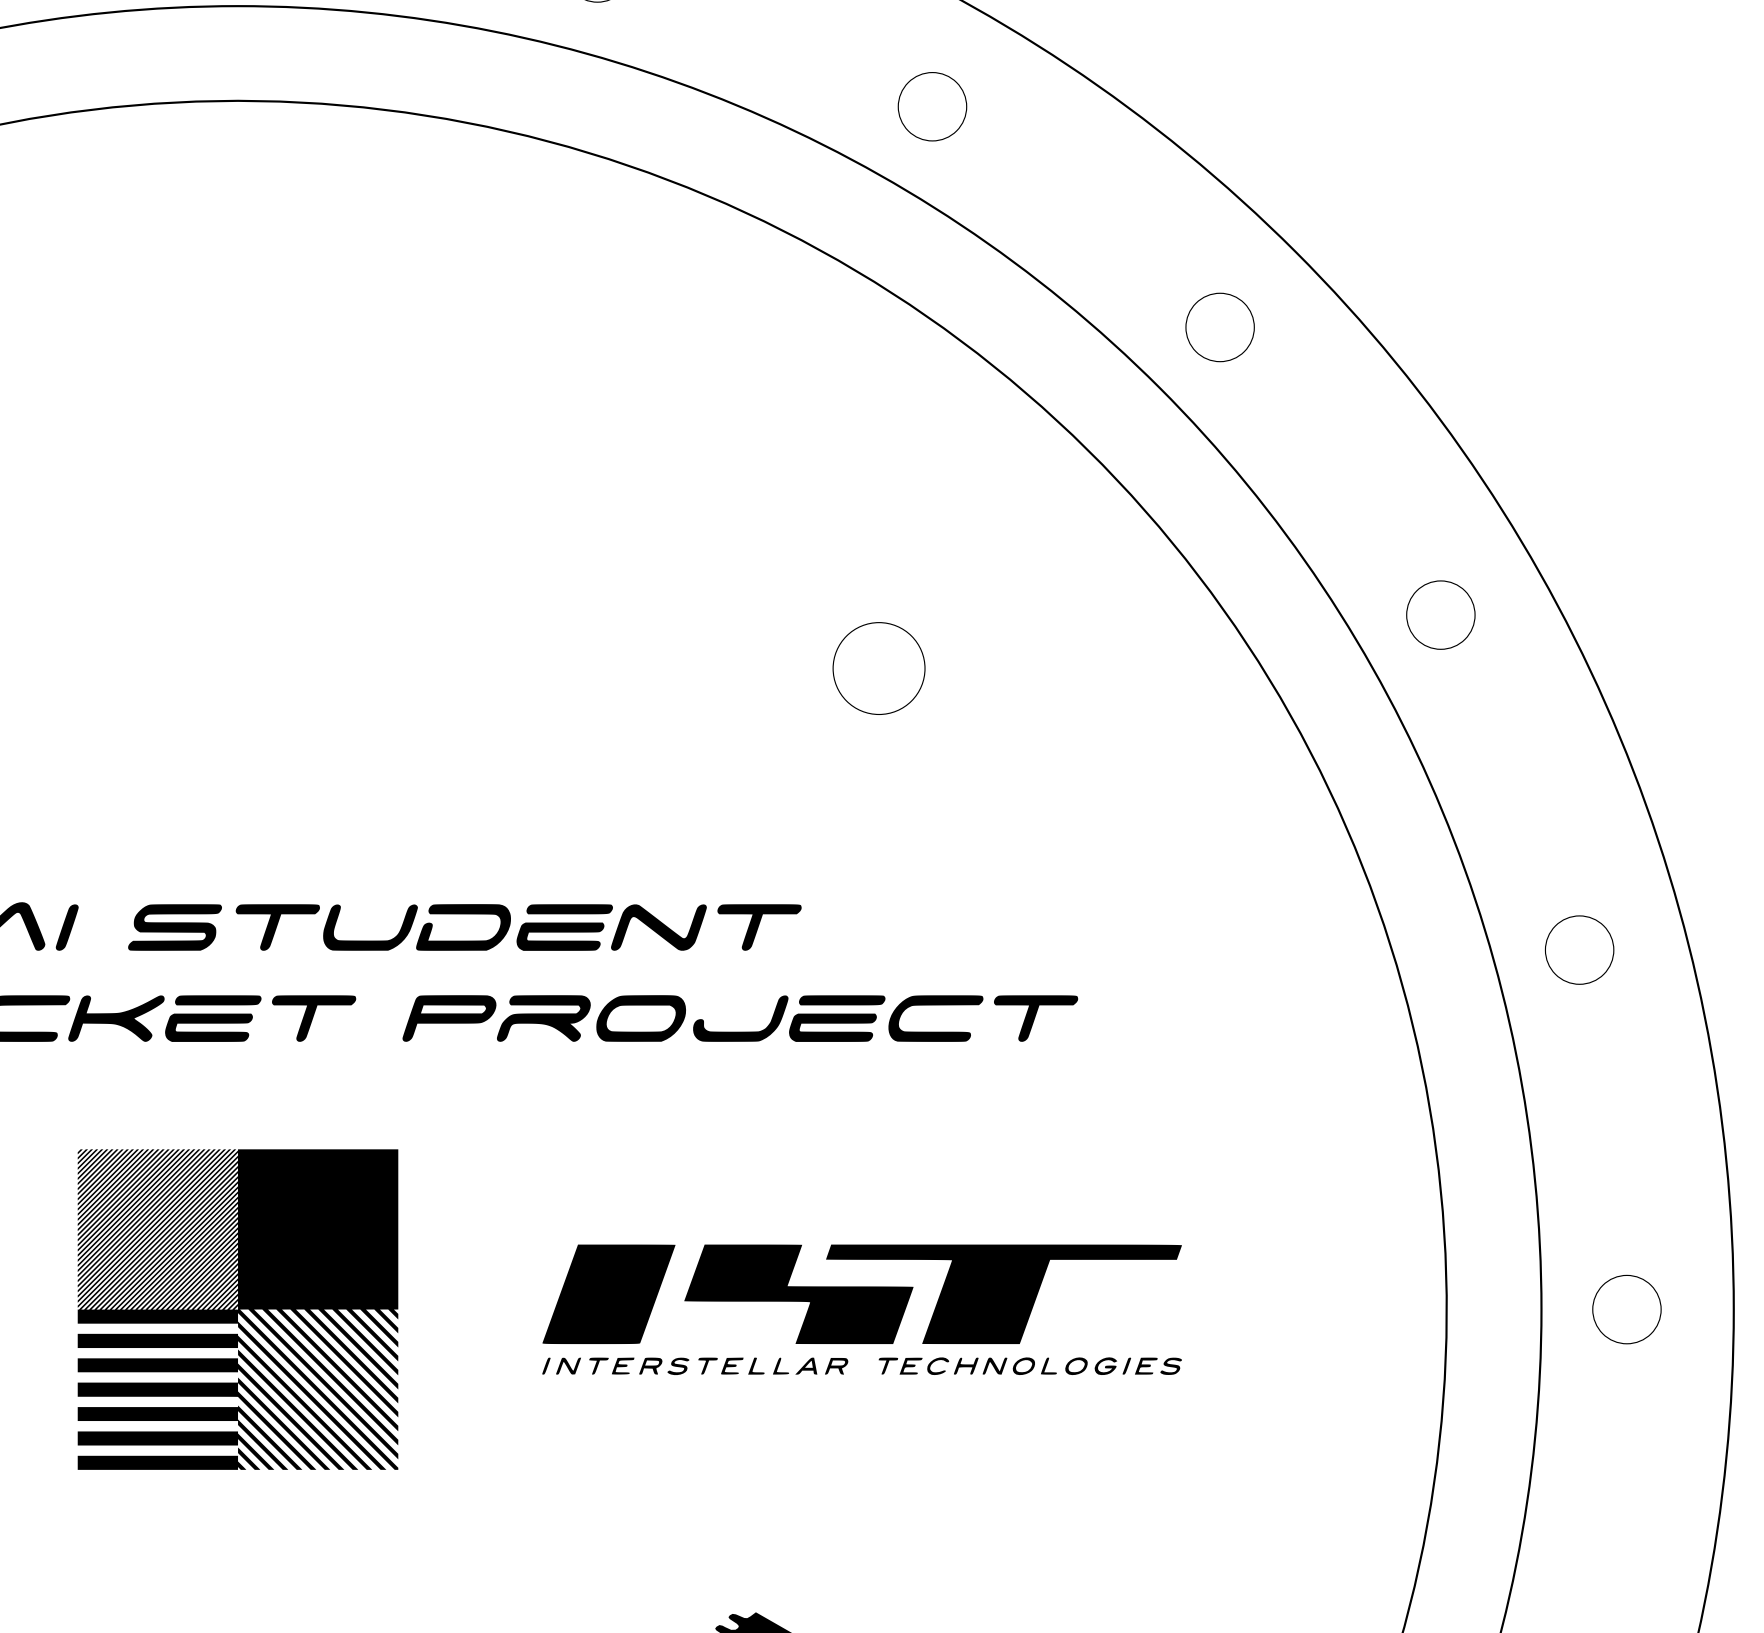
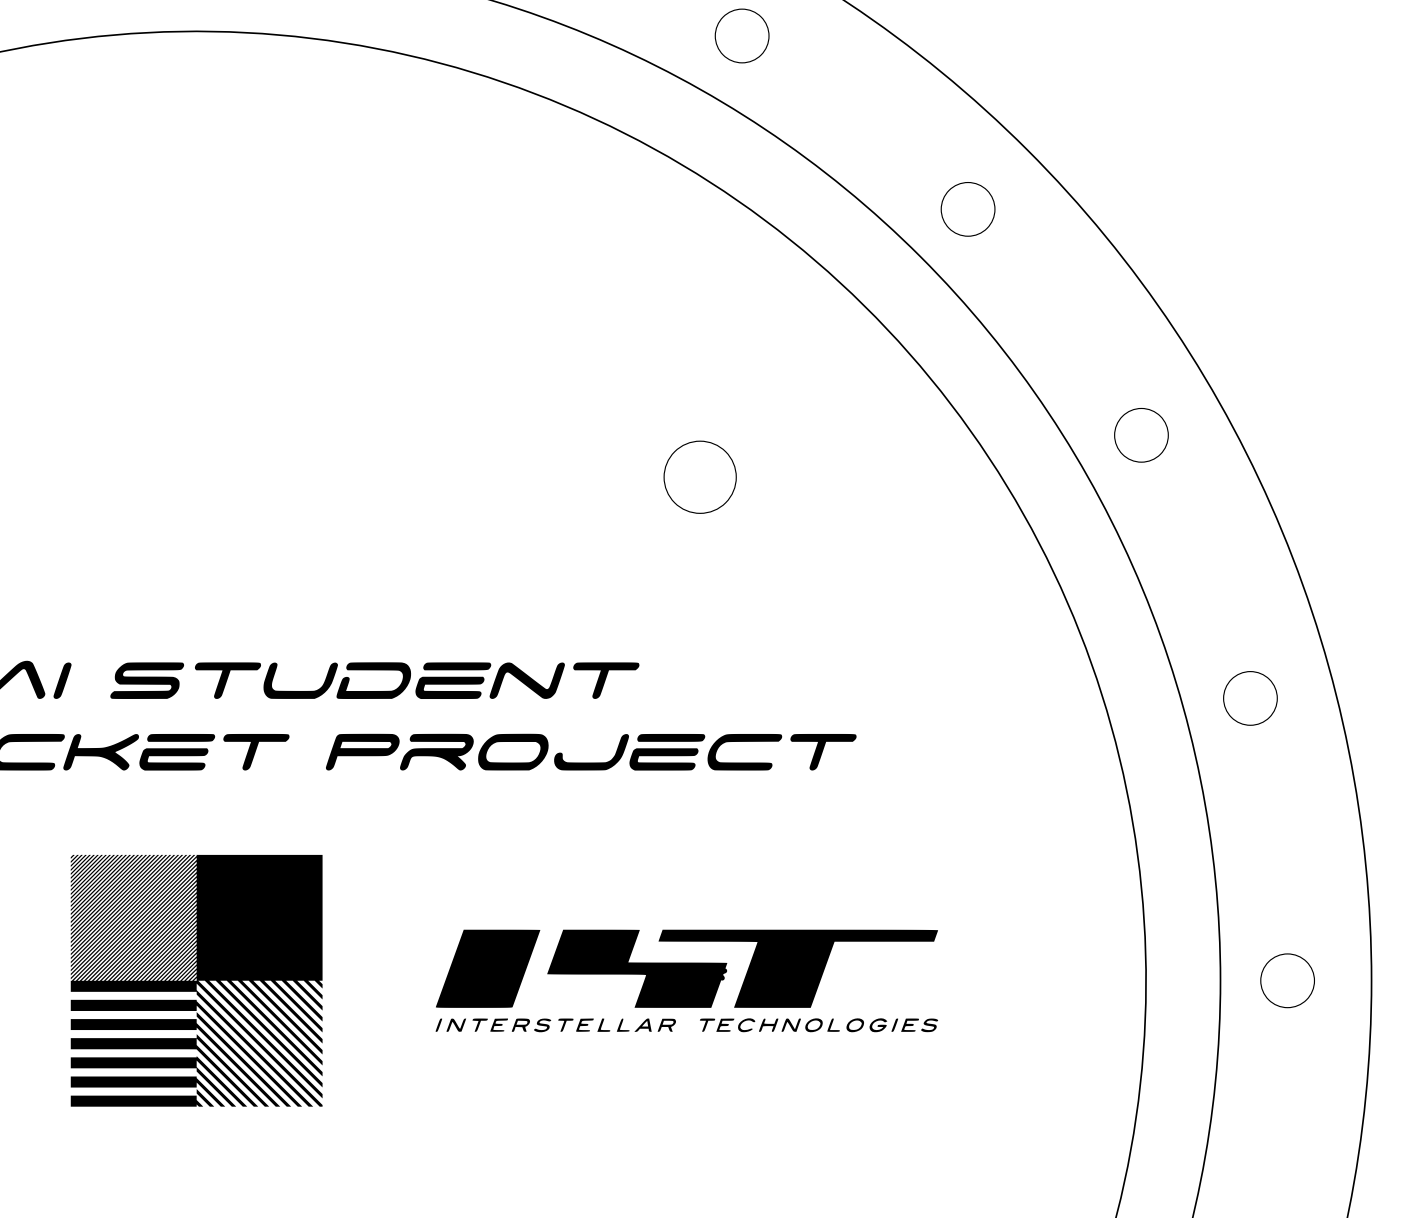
drawing: [542, 1244, 1183, 1376] -> none
part: none -> (686, 980)

